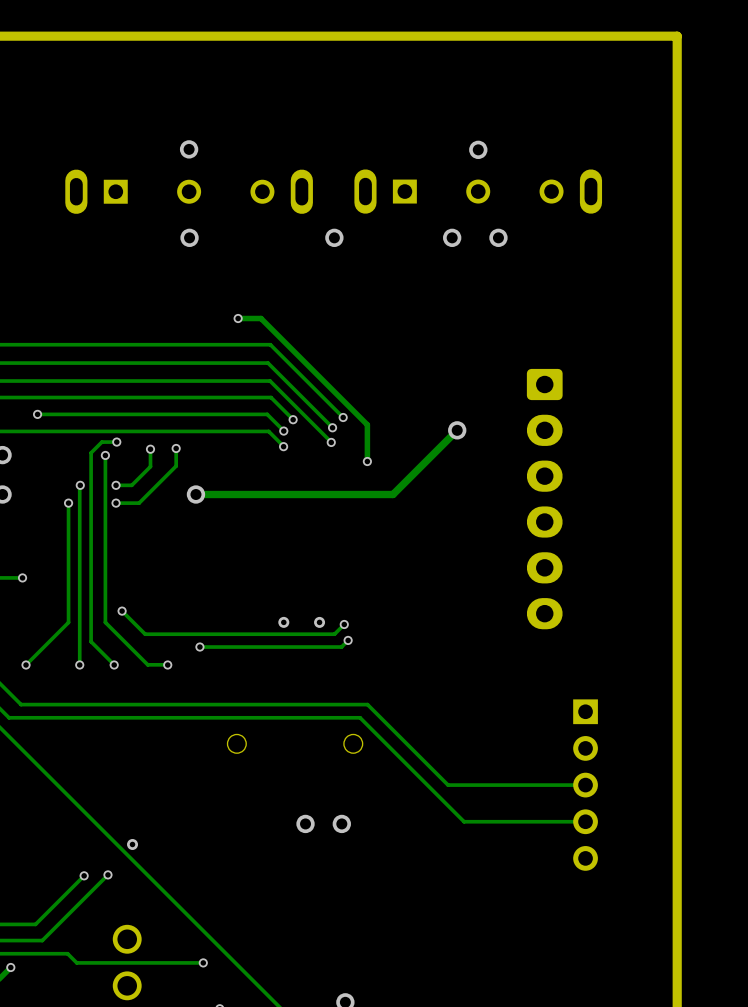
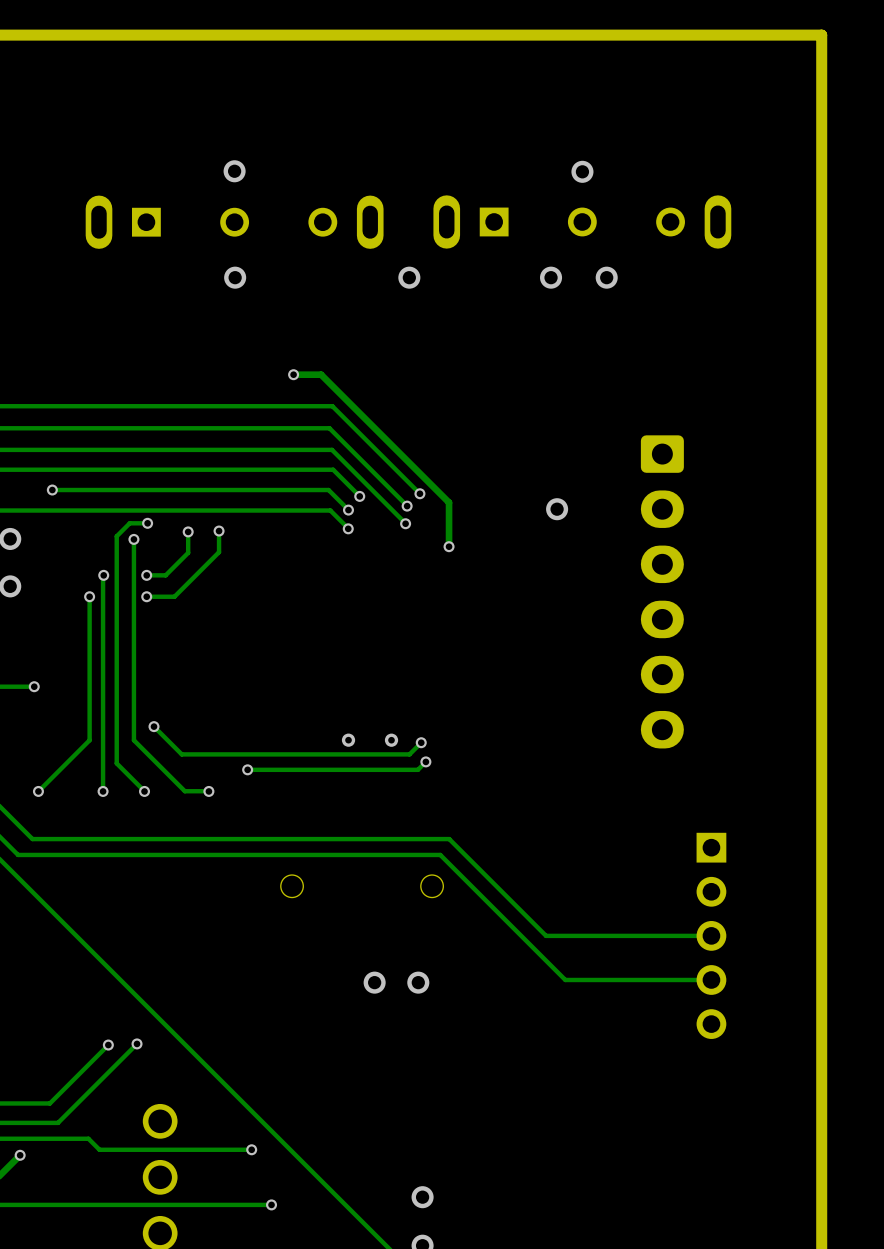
track: (457, 430) (393, 494) (195, 494) -> none
via: (195, 494) -> none
via: (132, 844) -> none

